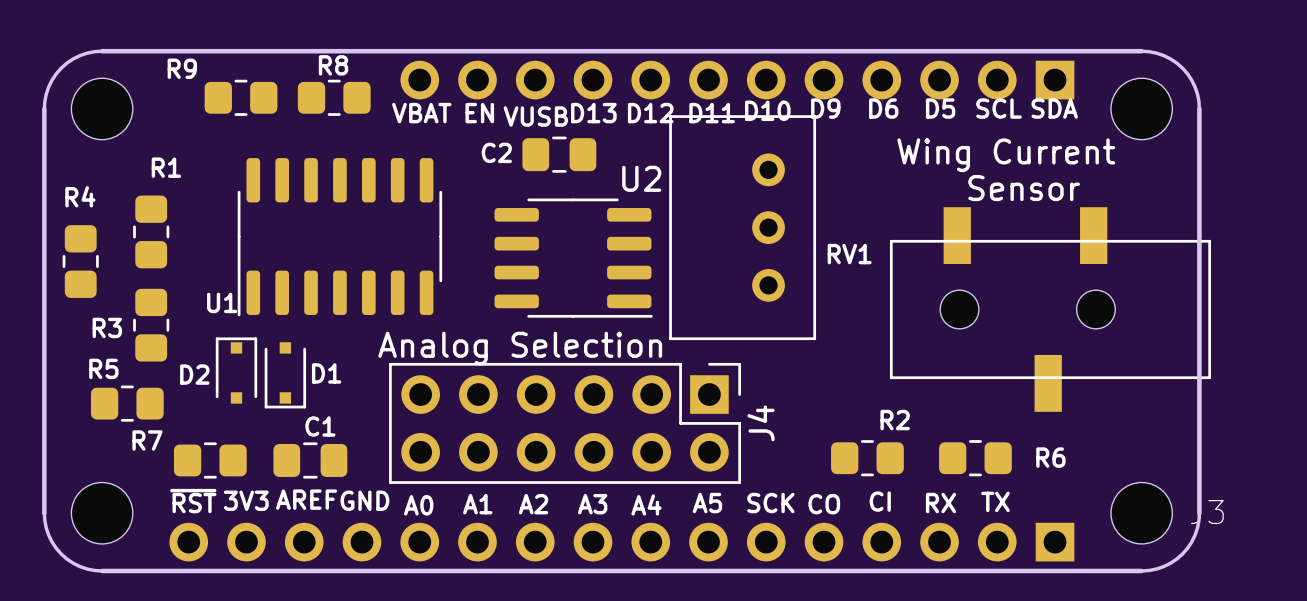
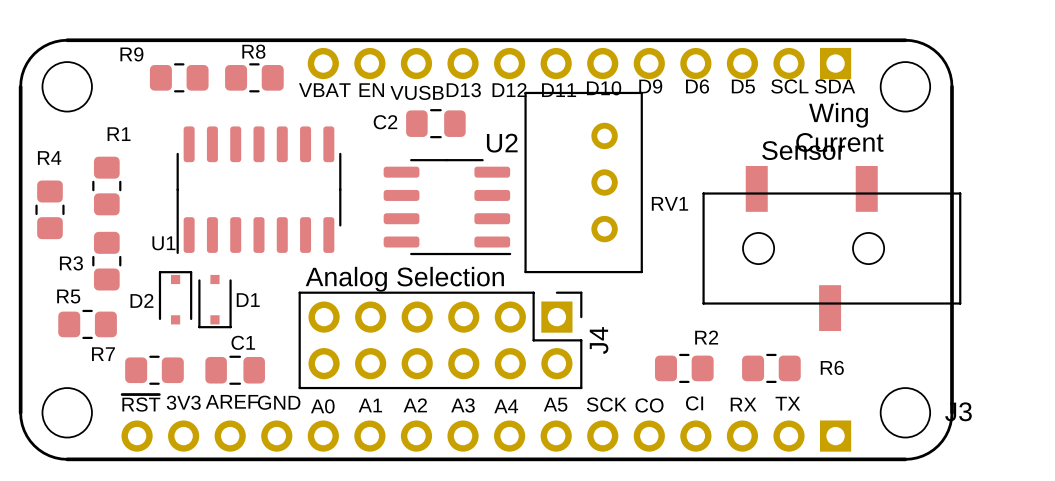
text: none -> Wing (838, 115)
text: Wing Current (1006, 155) -> Current (839, 142)

